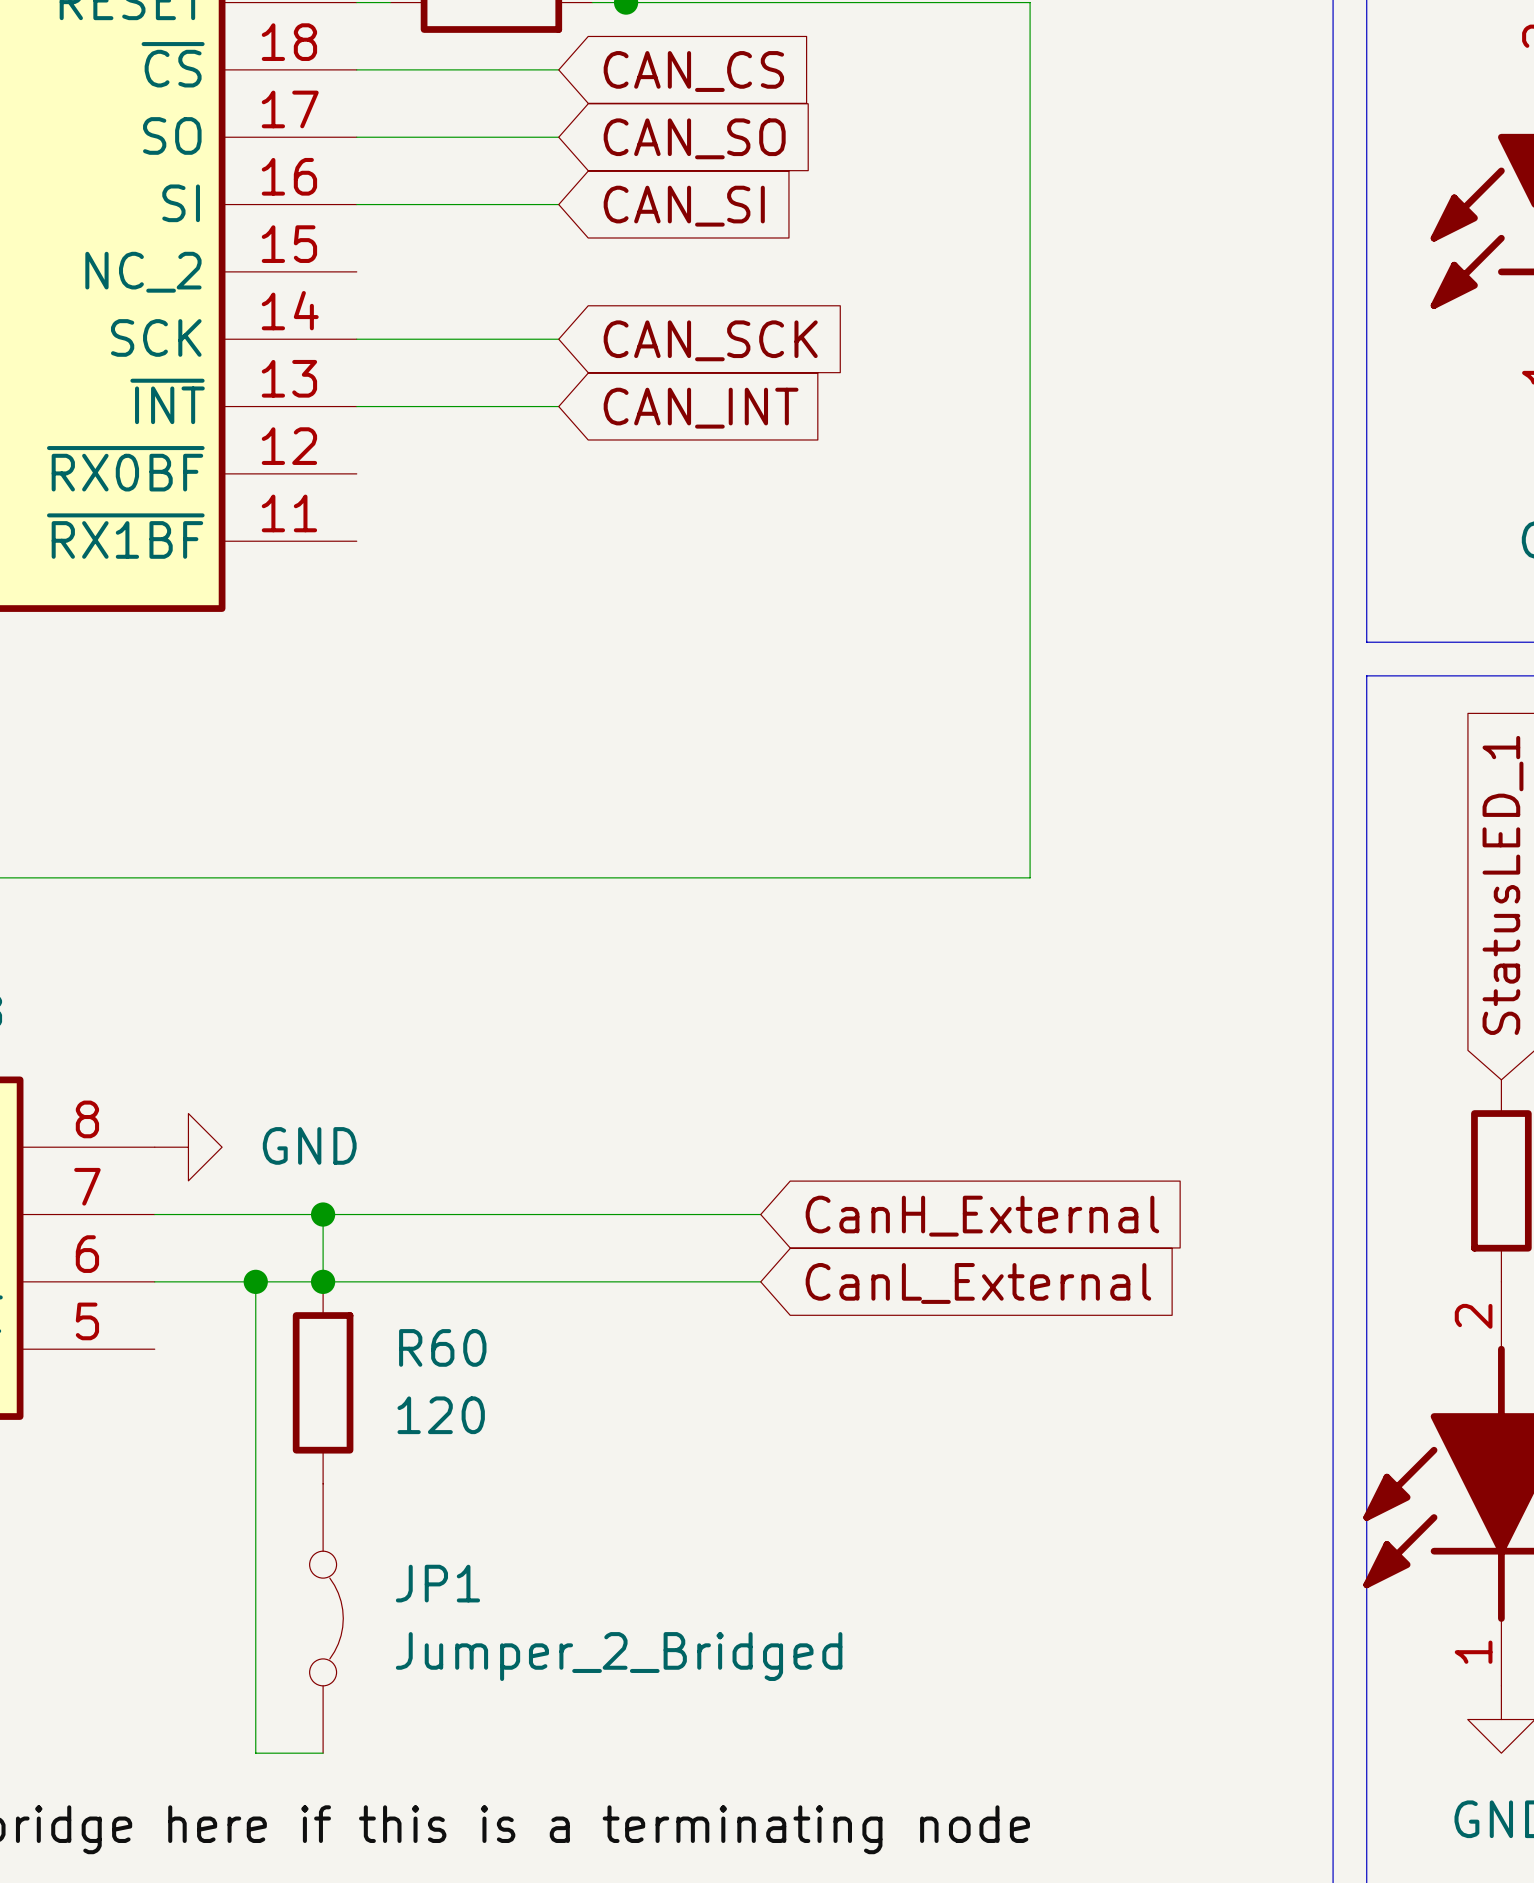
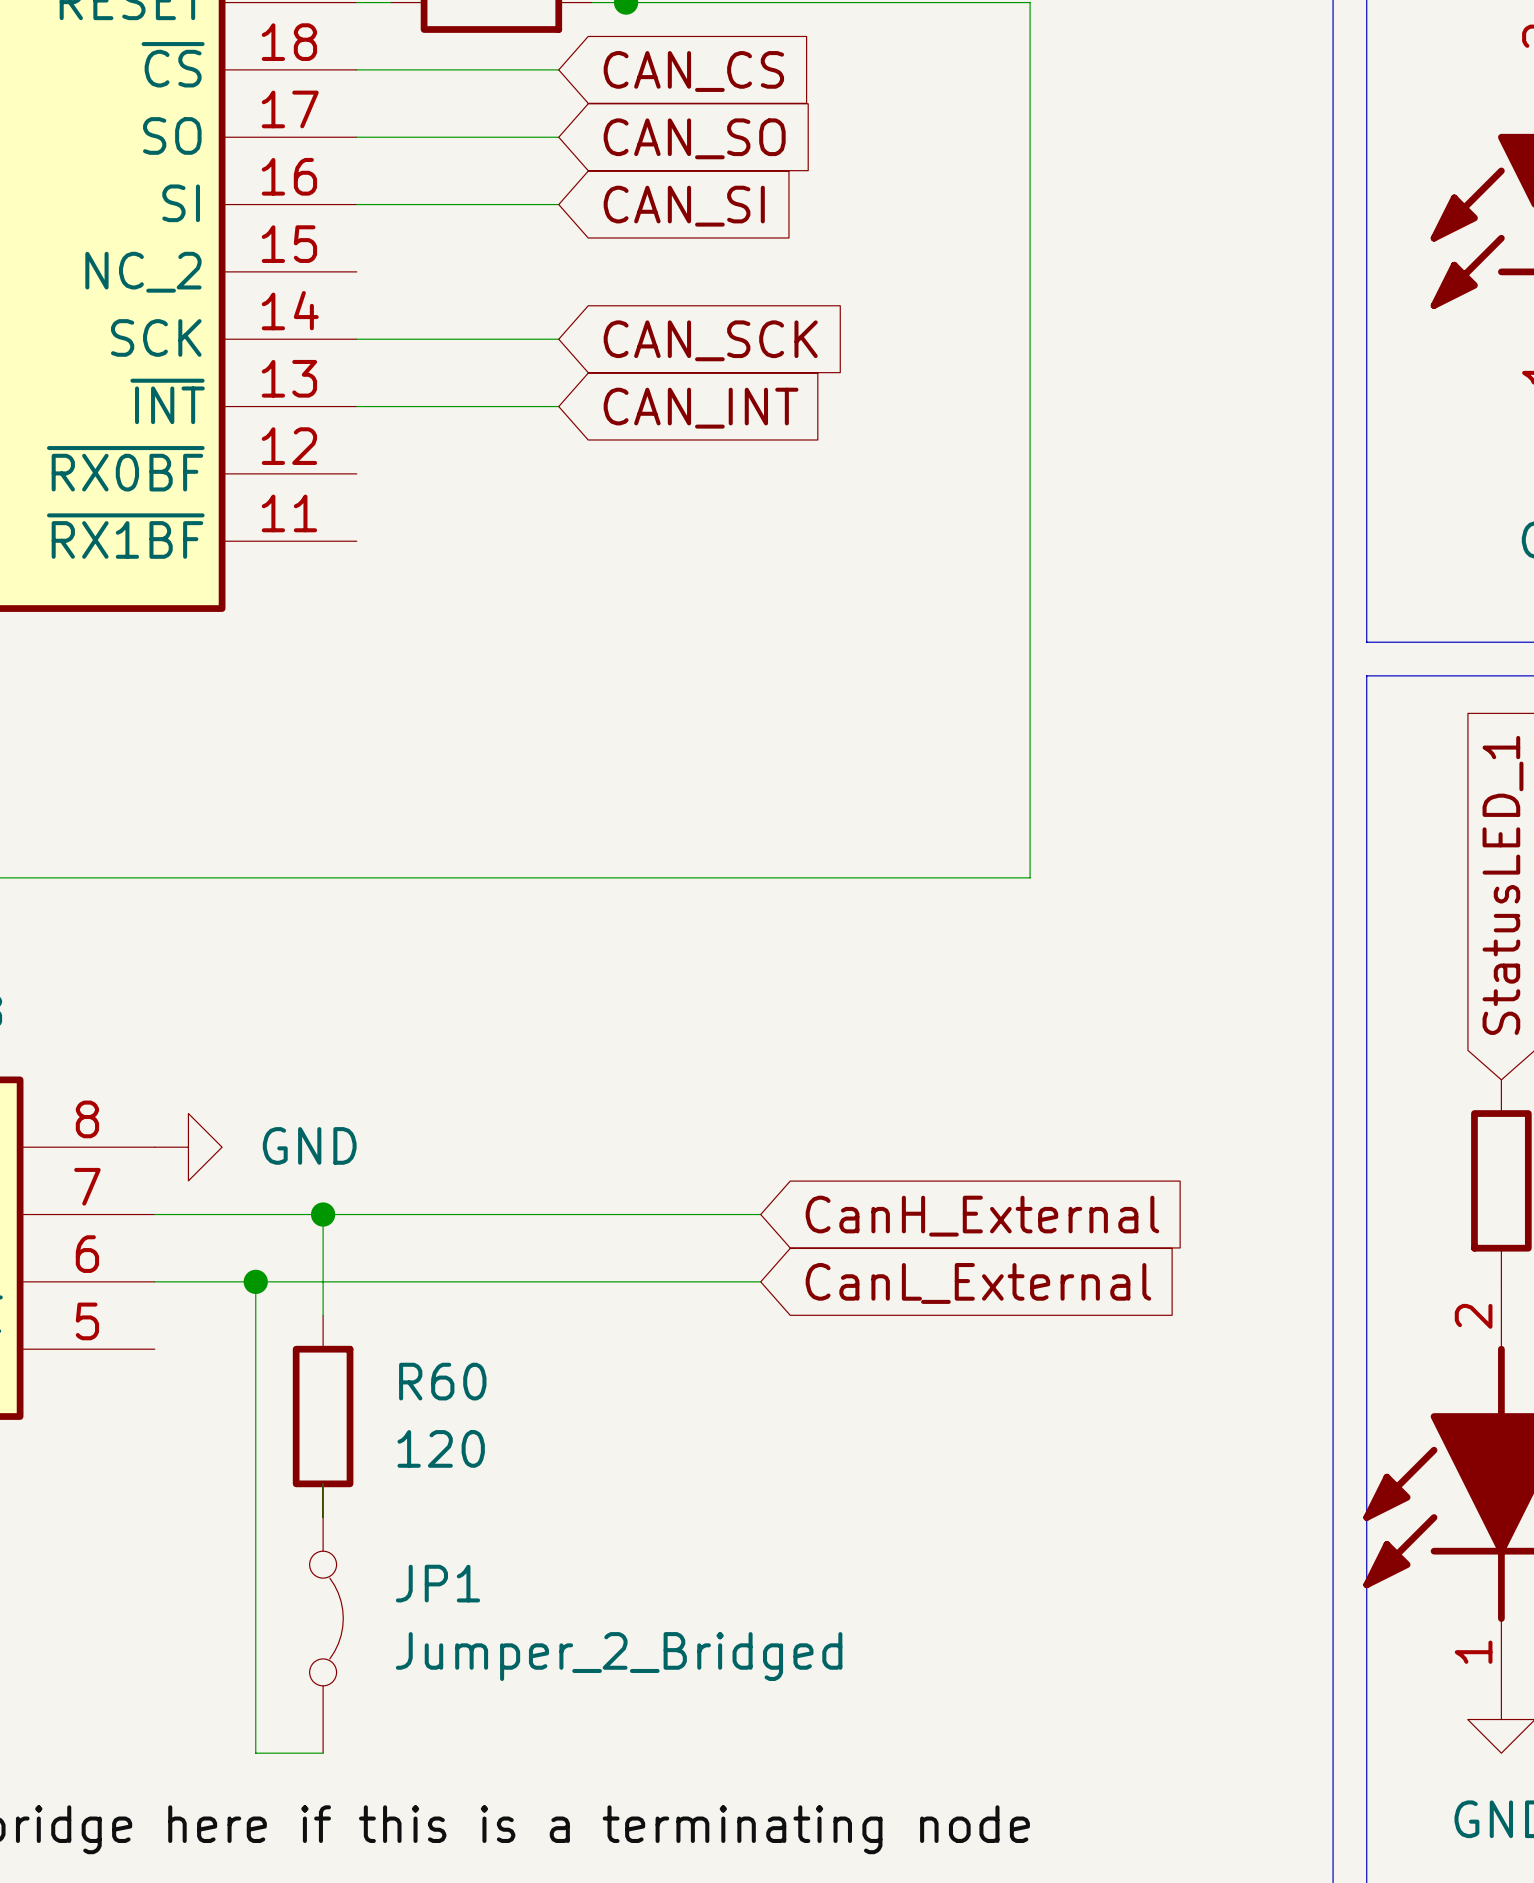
junction: (323, 1281) -> none
R60 position: (323, 1382) -> (323, 1416)

